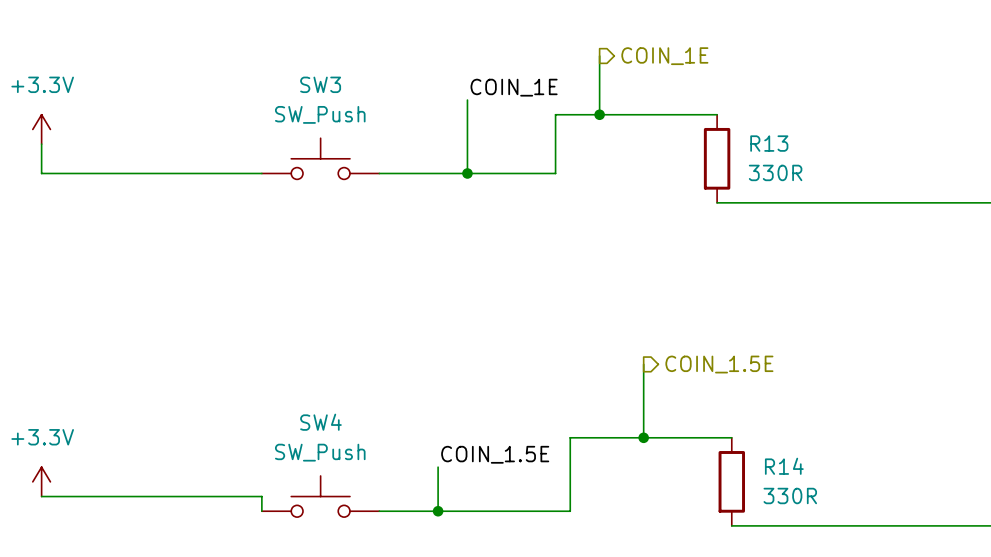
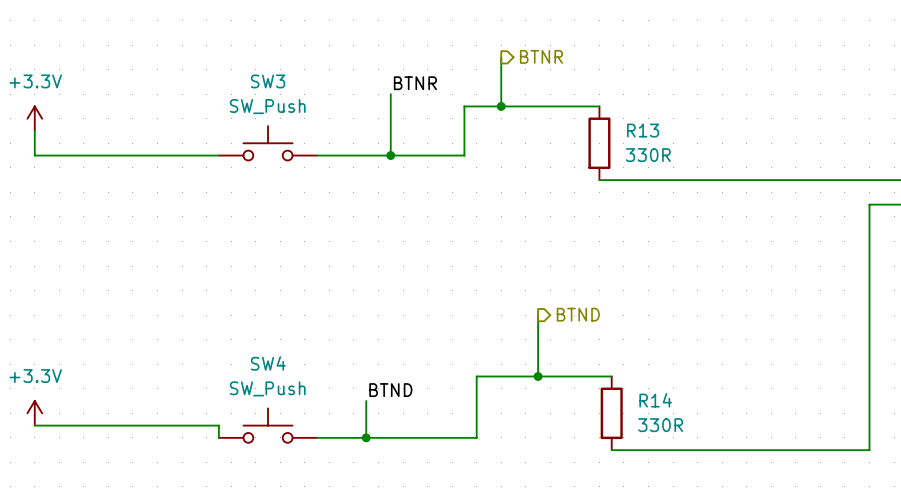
hierarchical label: COIN_1E (664, 56) -> BTNR (541, 56)
label: COIN_1E (514, 87) -> BTNR (415, 83)
hierarchical label: COIN_1.5E (719, 364) -> BTND (578, 314)
label: COIN_1.5E (495, 454) -> BTND (390, 390)

